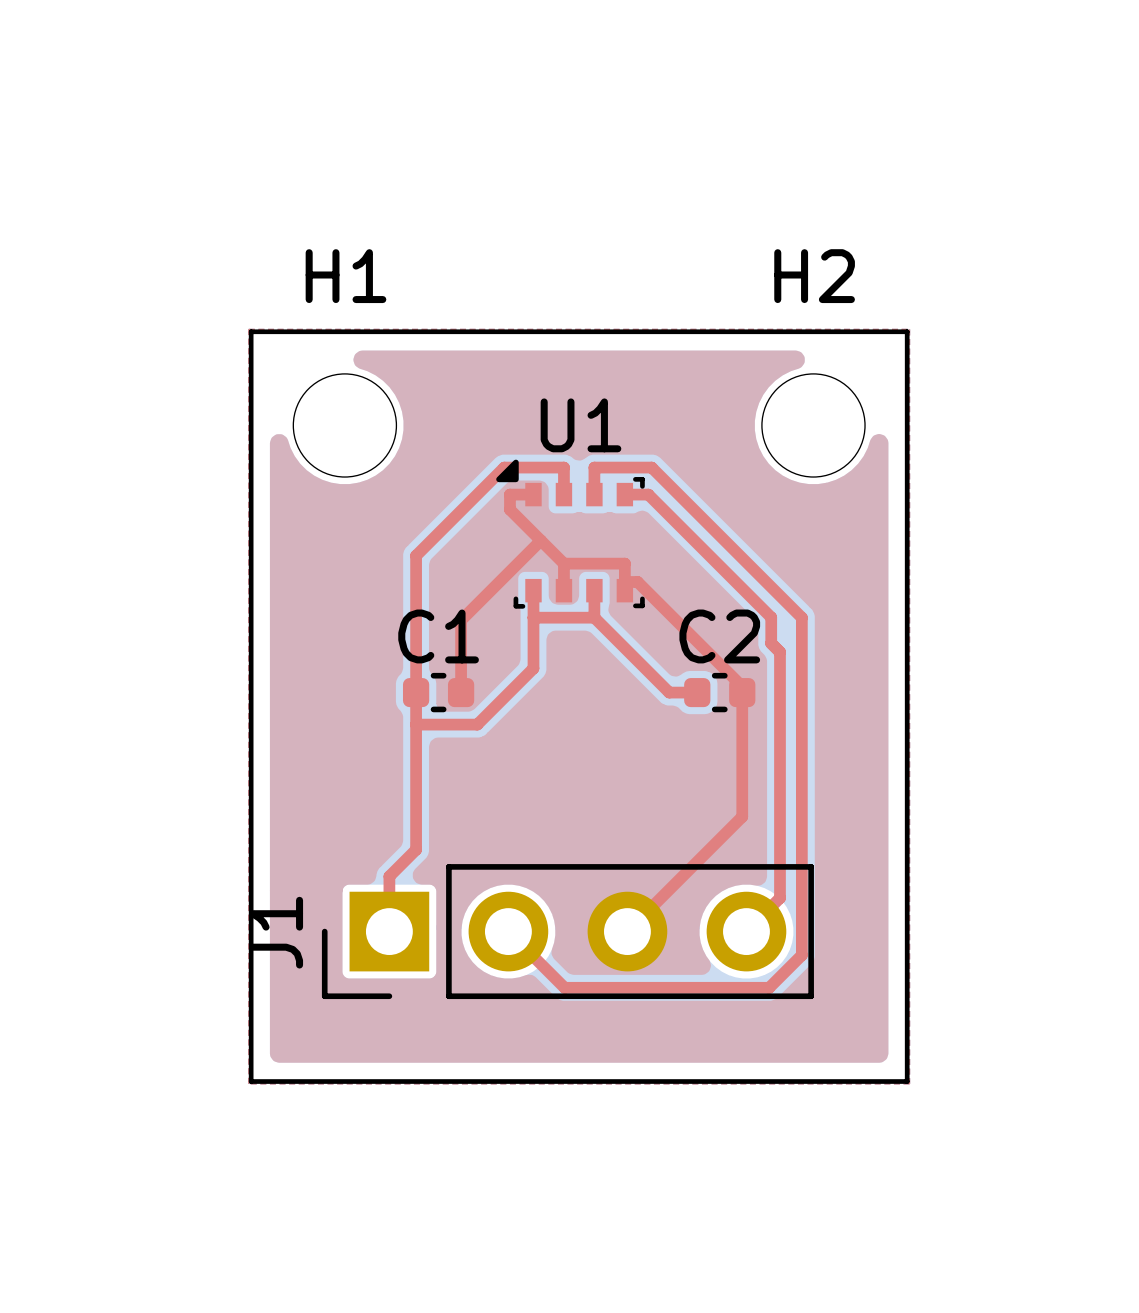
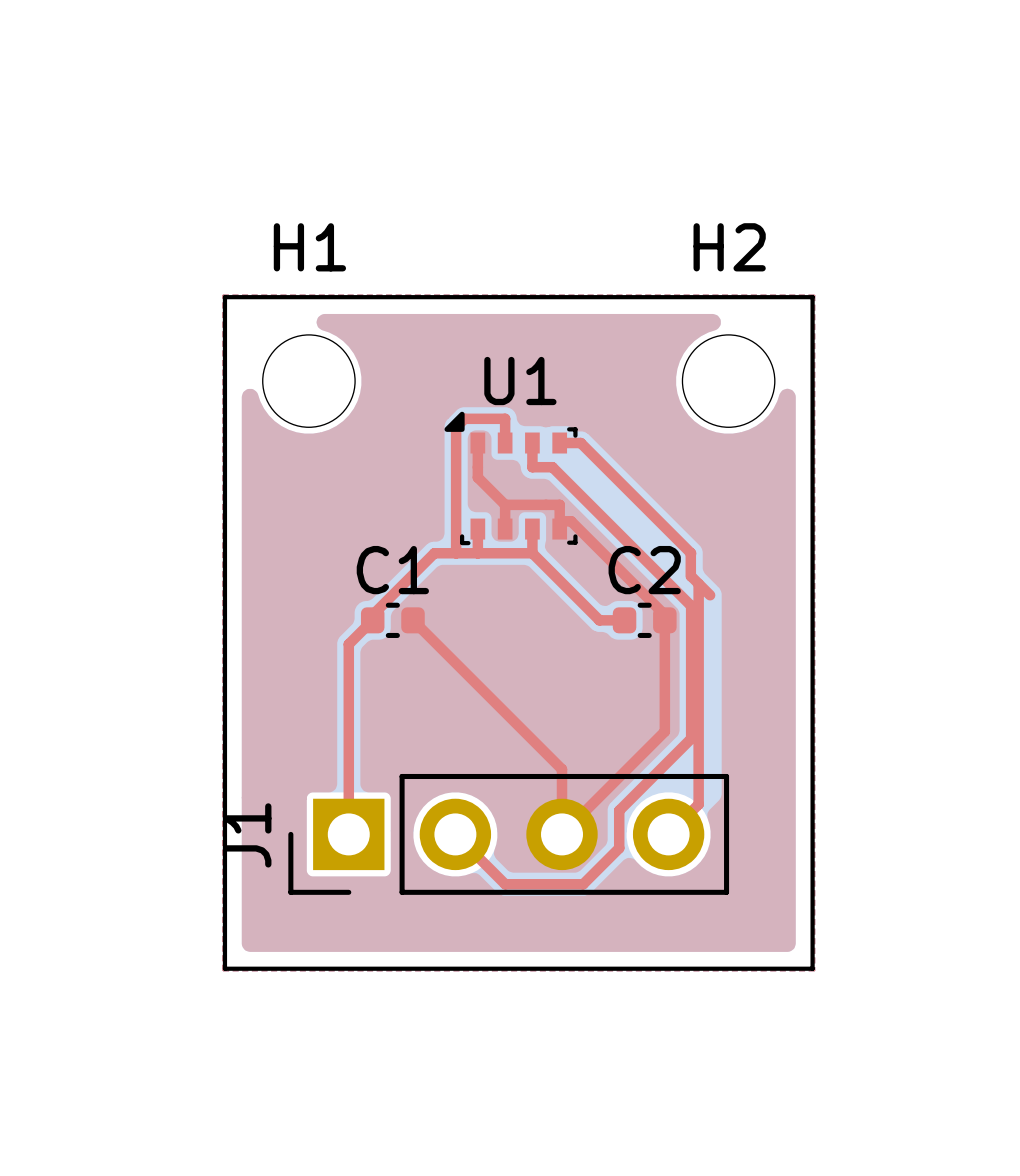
top track: (518, 467) (504, 467) (416, 555) (416, 686) -> (464, 418) (456, 427) (456, 553)
top track: (533, 494) (509, 494) (509, 509) (533, 533) -> (477, 443) (477, 477)
top track: (594, 494) (594, 467) (651, 467) (801, 617) (801, 955) (769, 987) (564, 987) -> (532, 443) (532, 467) (552, 467) (691, 605) (691, 738) (619, 810) (619, 848) (583, 884) (505, 884)
top track: (540, 540) (461, 620) (461, 692) -> (562, 834) (562, 769) (413, 620)
top track: (533, 617) (533, 668) (477, 724) (416, 724) -> (477, 553) (434, 553) (372, 614)
top track: (416, 692) (416, 849) (389, 876) -> (372, 620) (348, 644) (348, 785)

